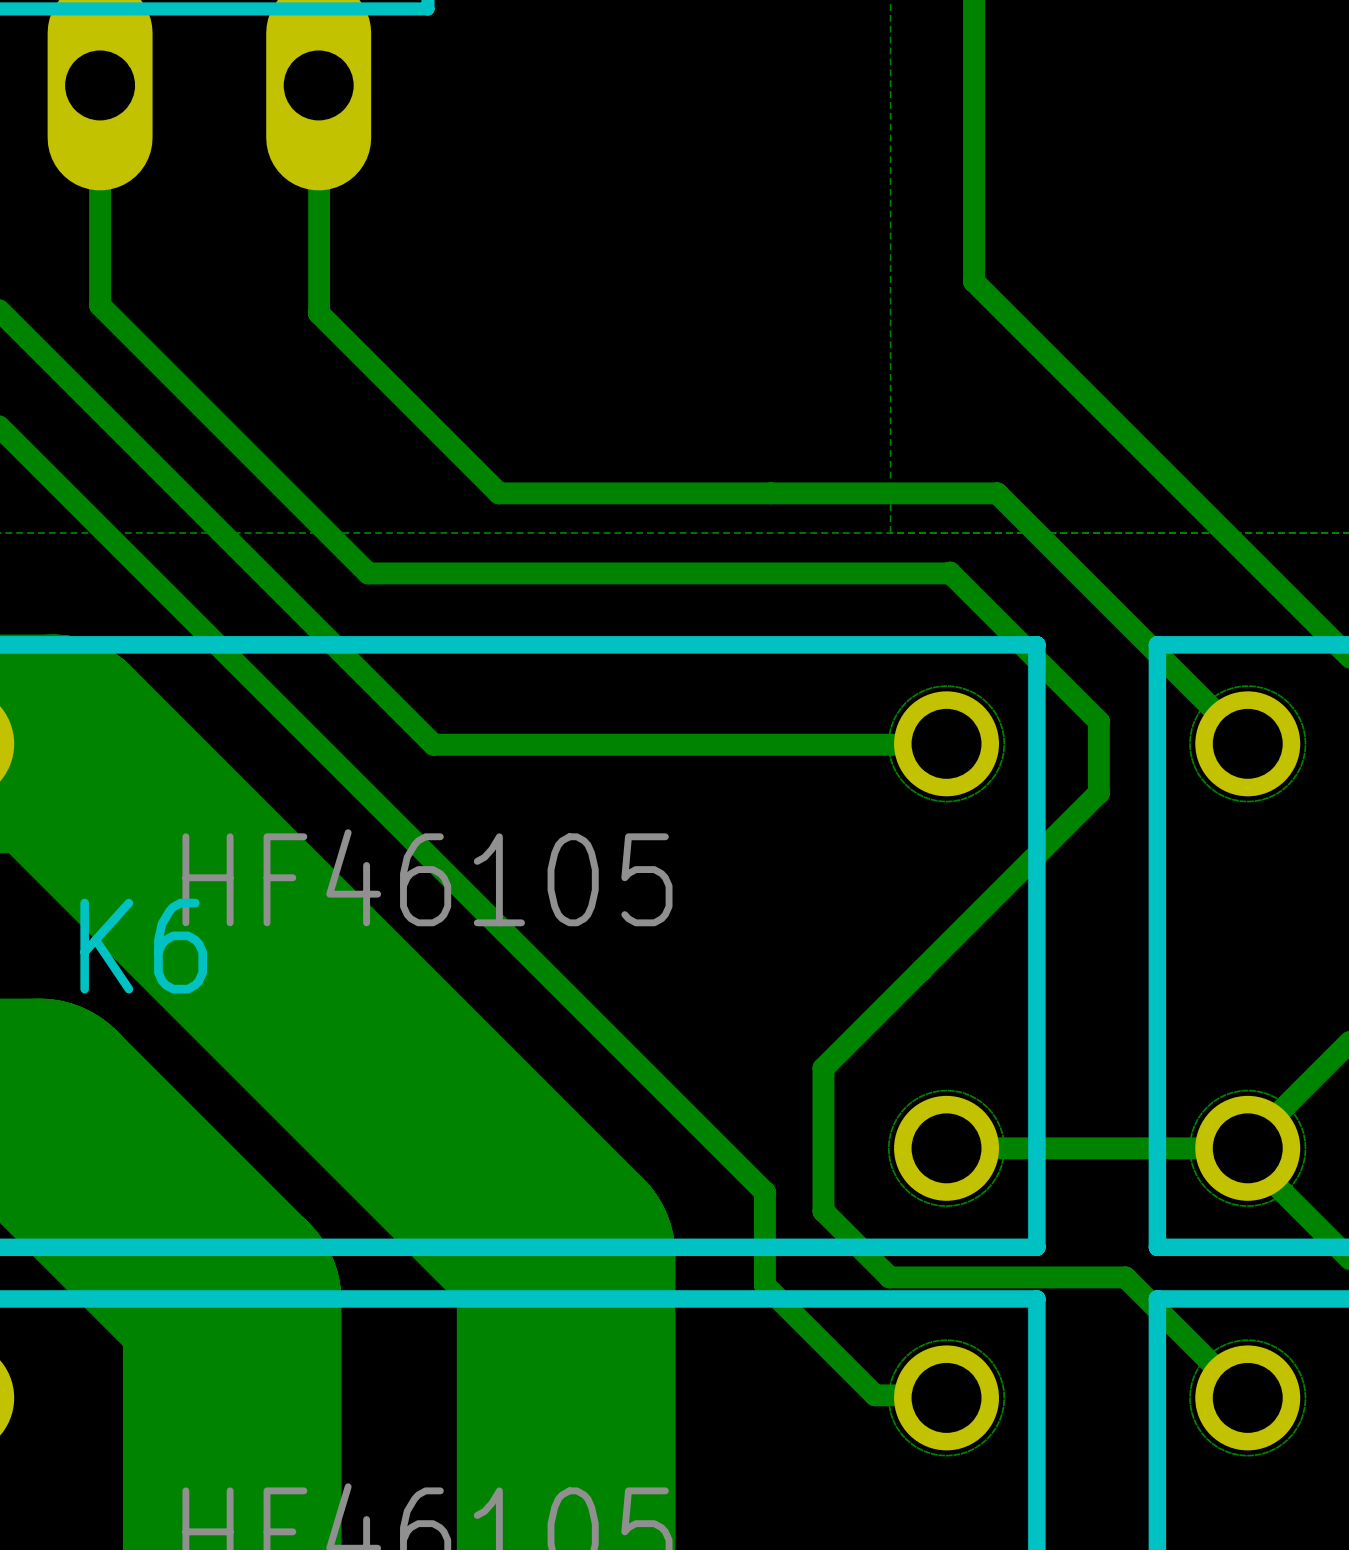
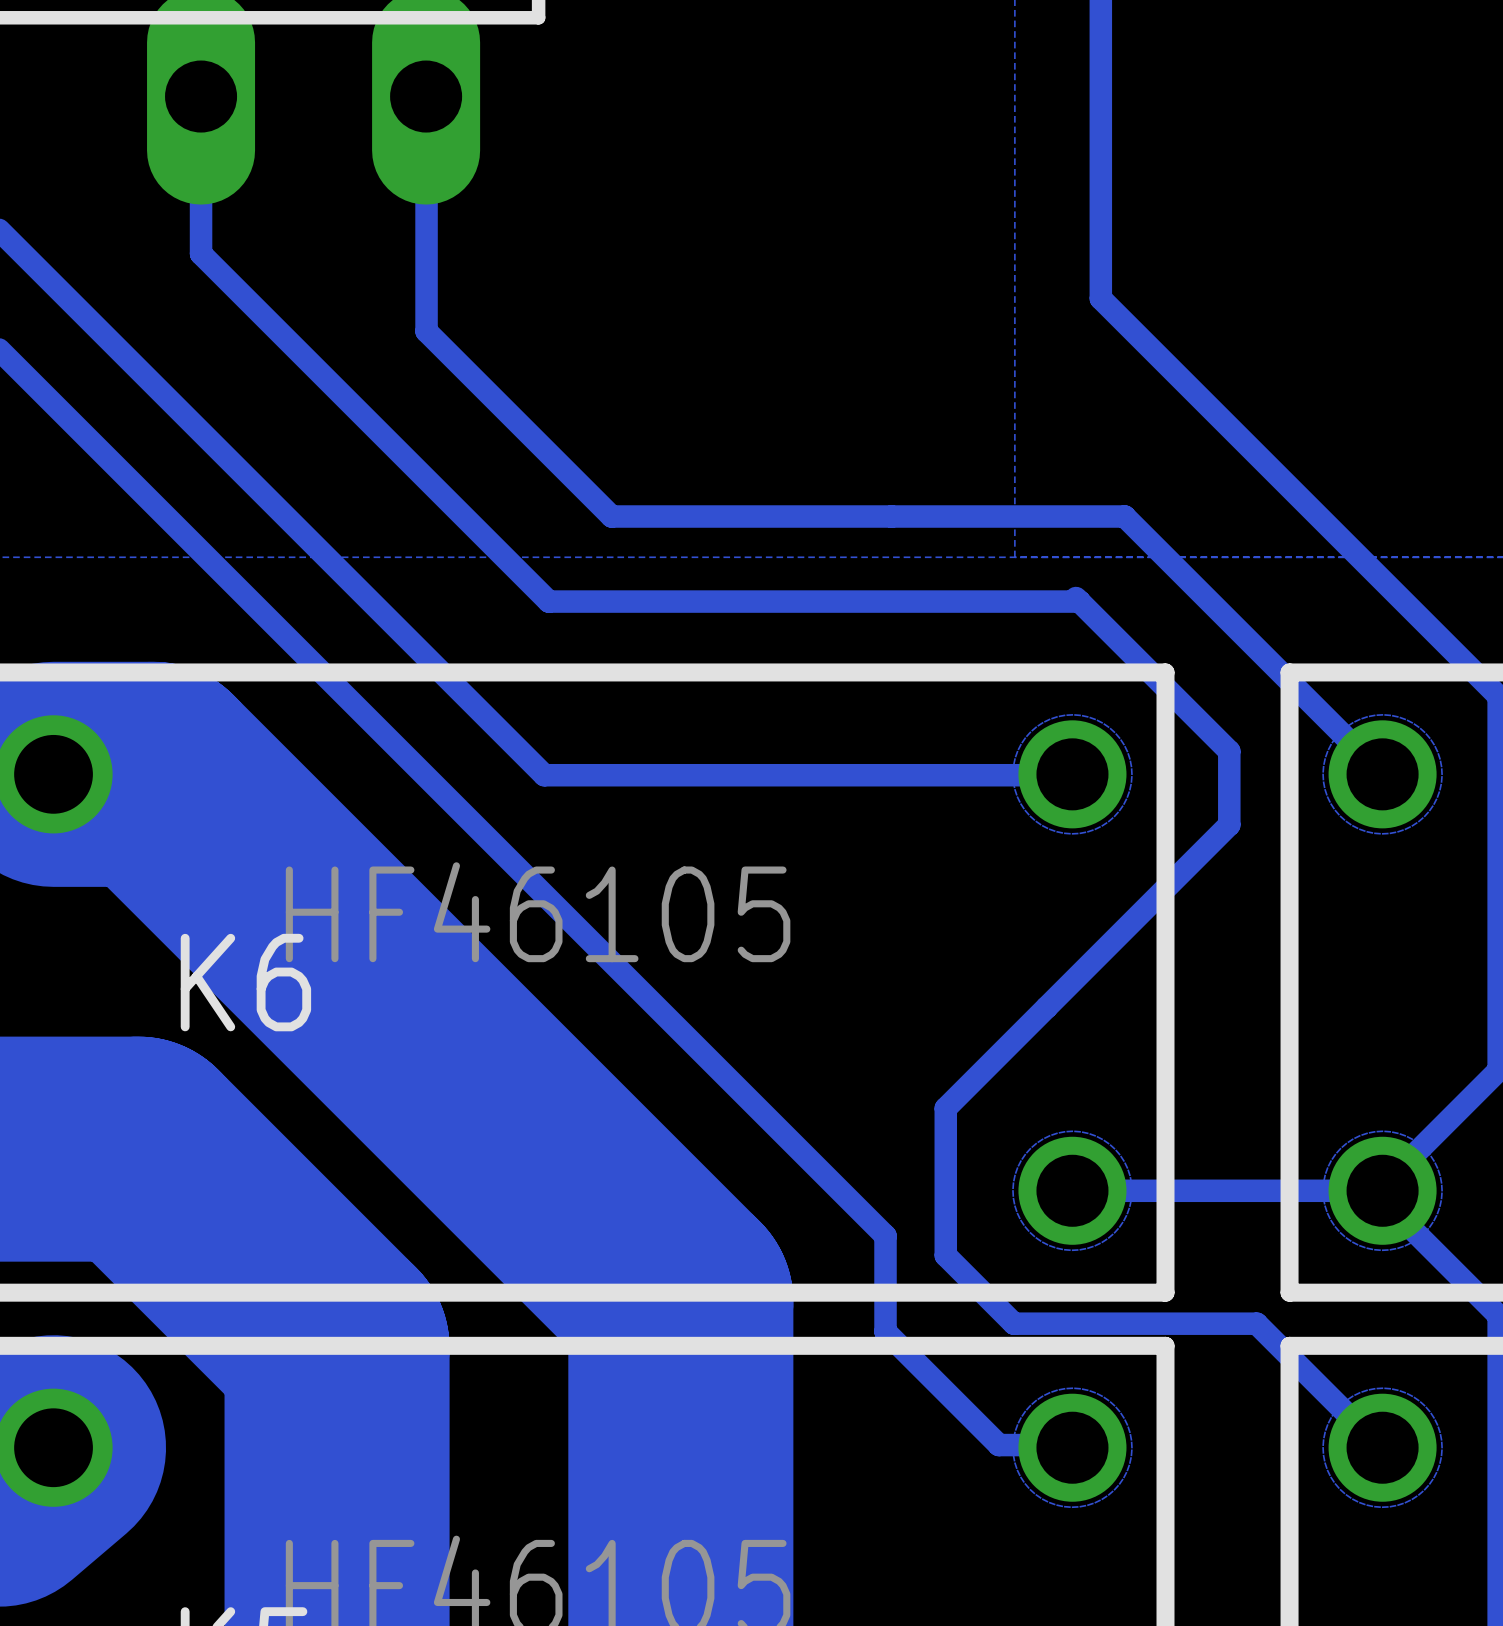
bottom track: (100, 238) (100, 305) (368, 573) (949, 573) -> (201, 253) (548, 601) (1079, 601)

